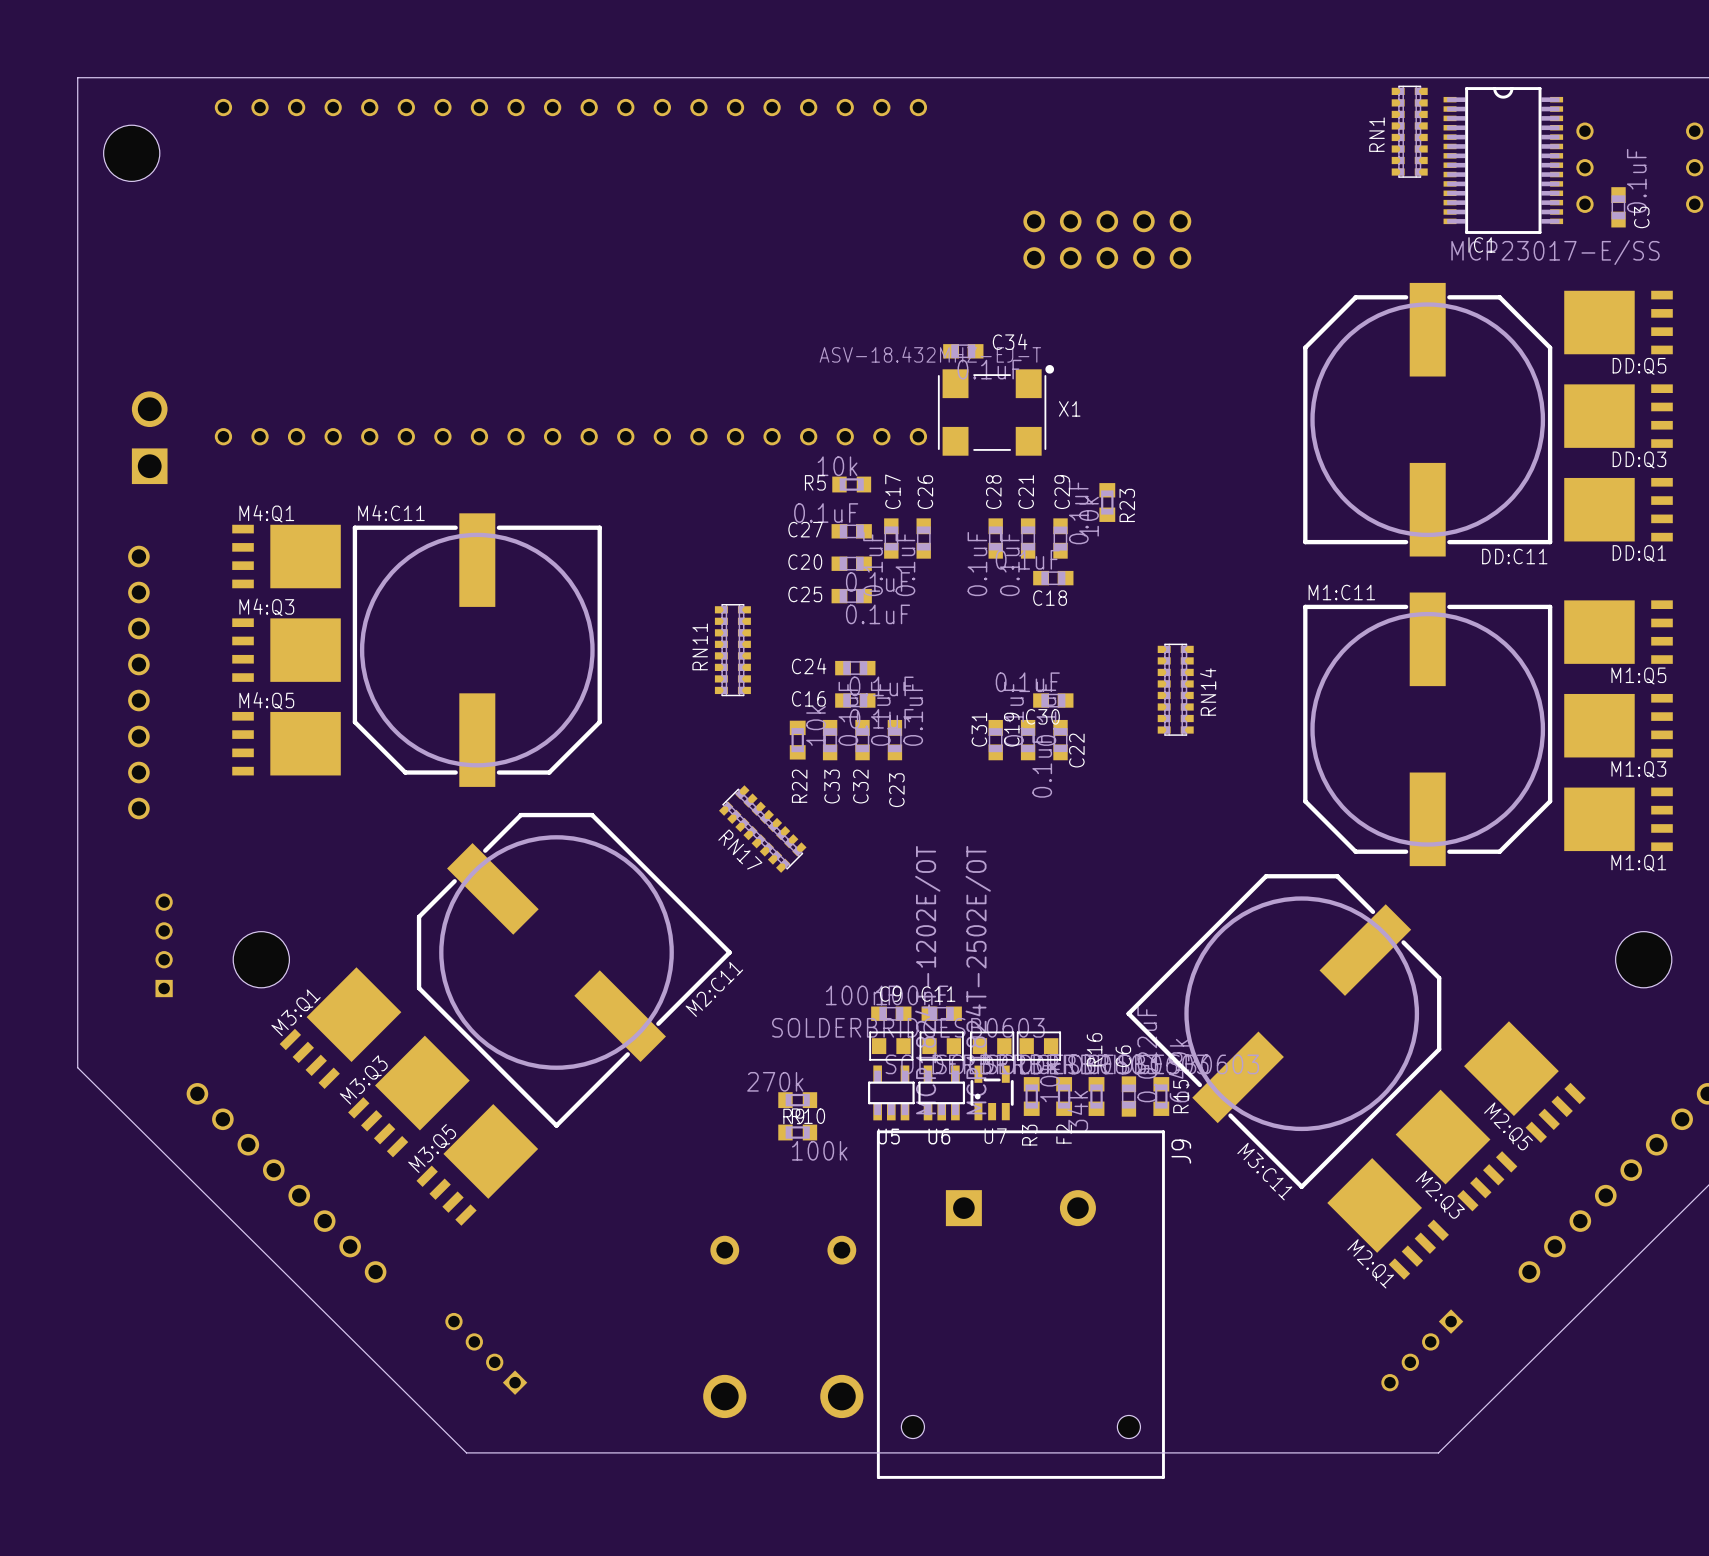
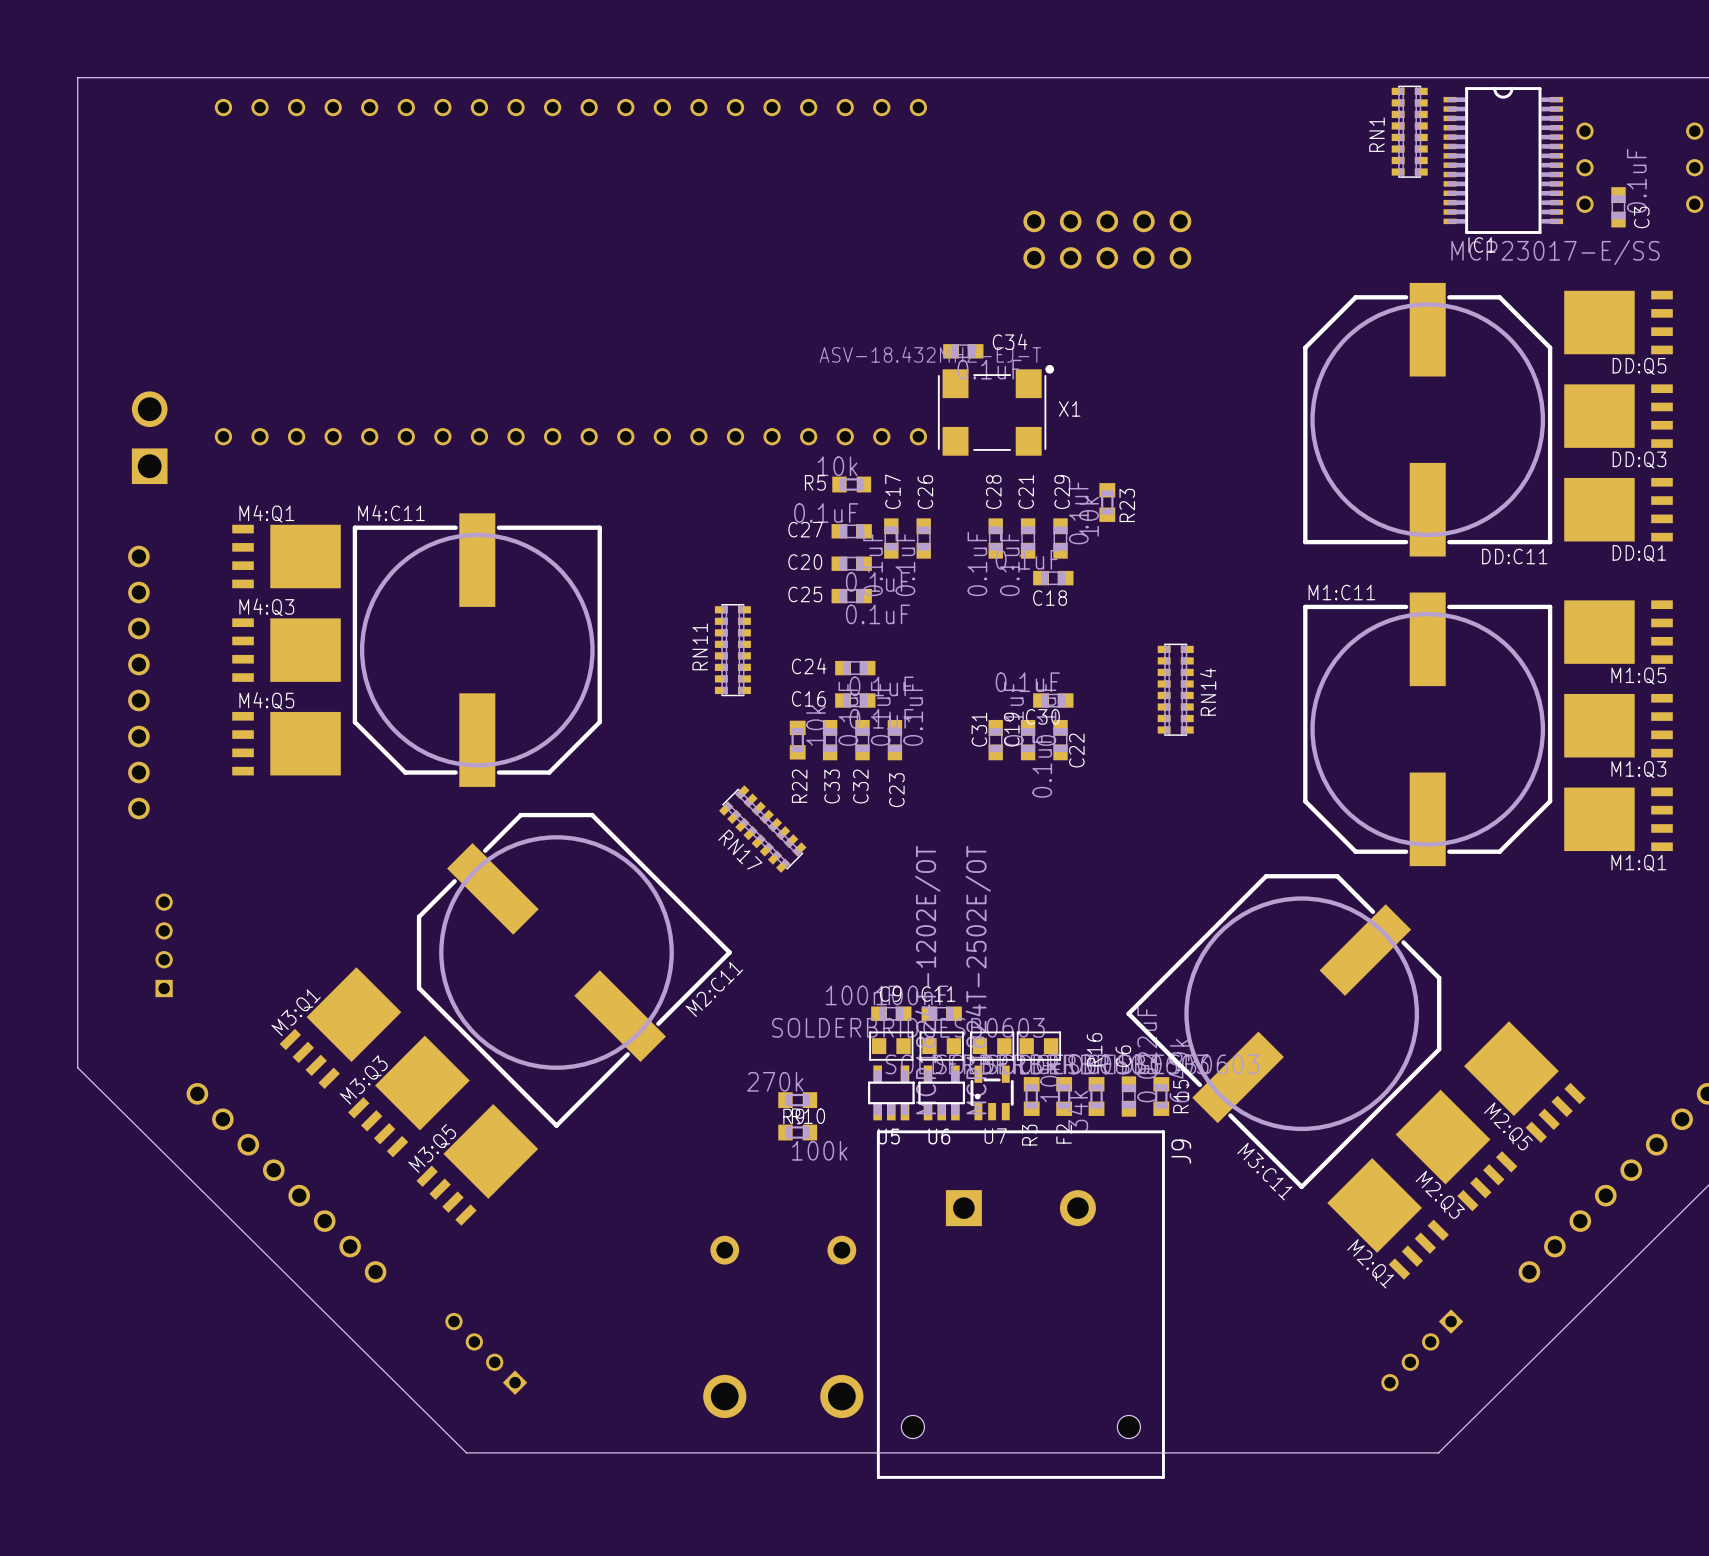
part: (131, 153) -> none
part: (261, 959) -> none
part: (1643, 959) -> none

